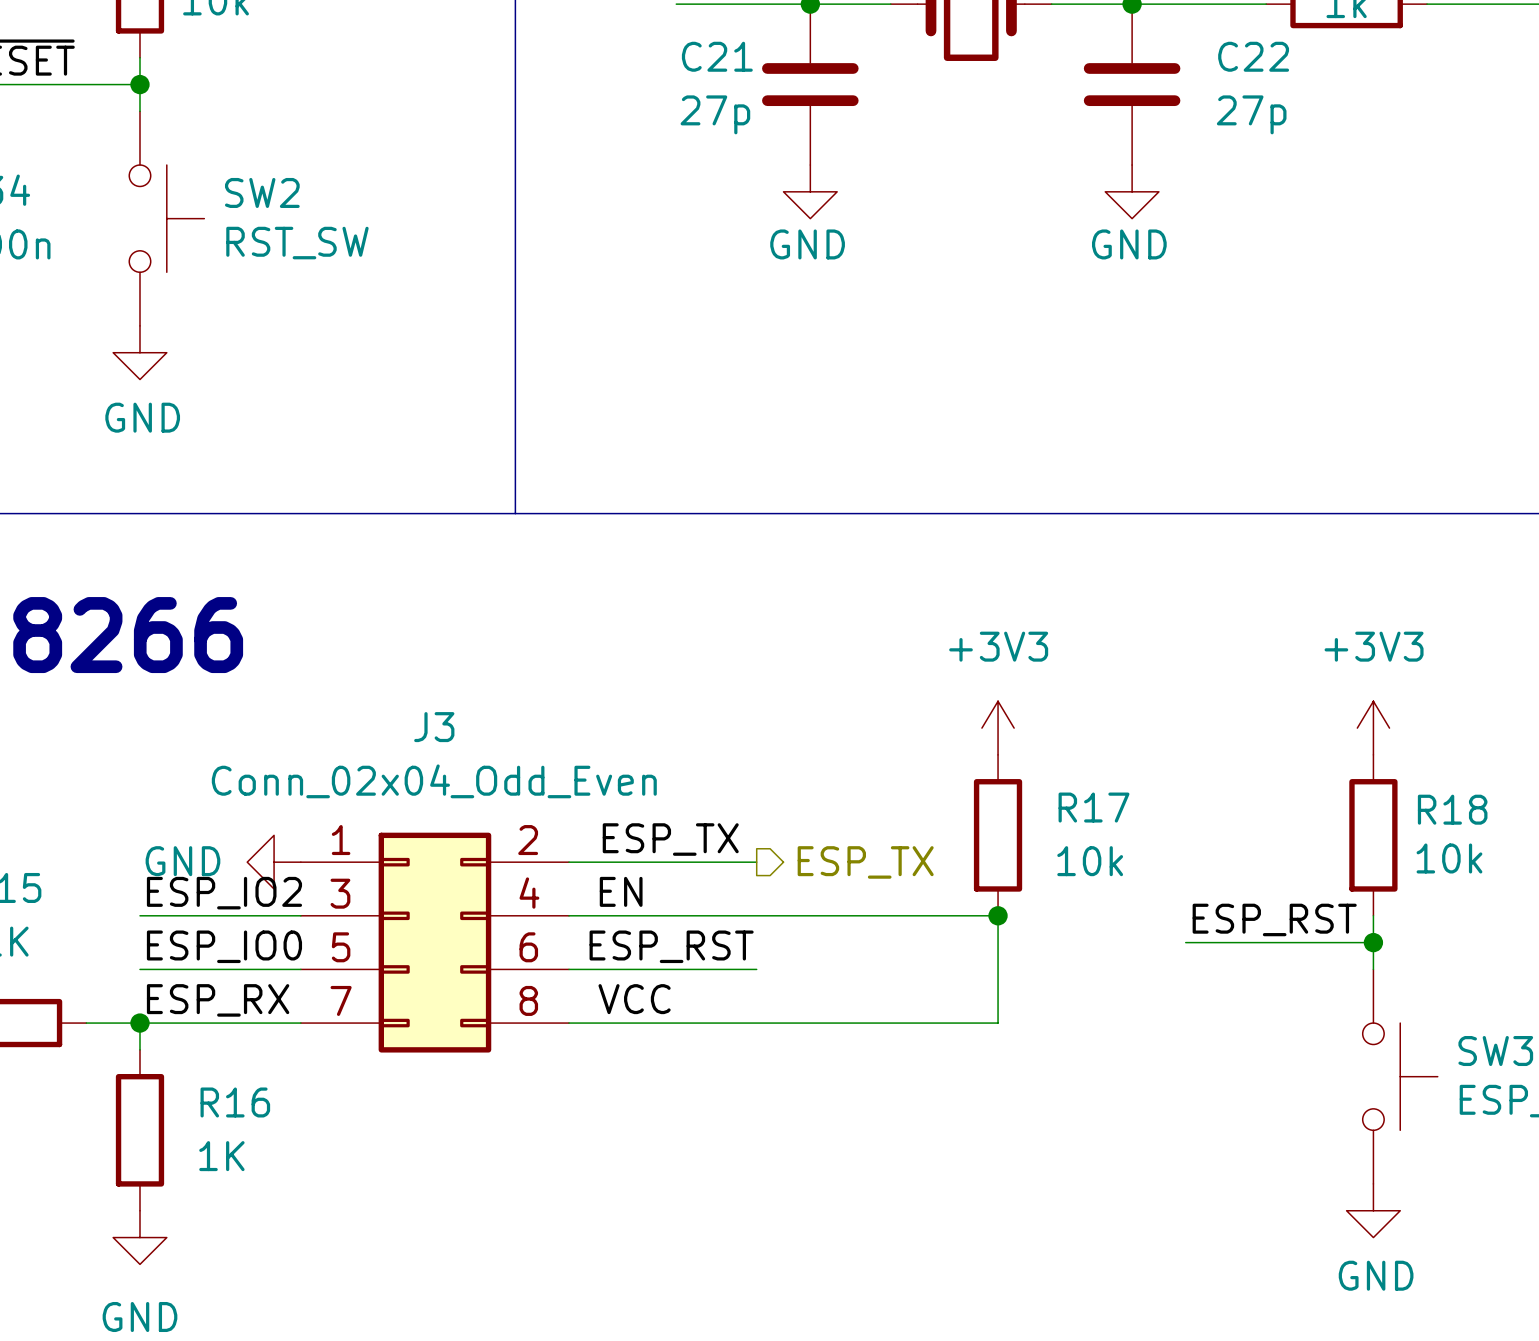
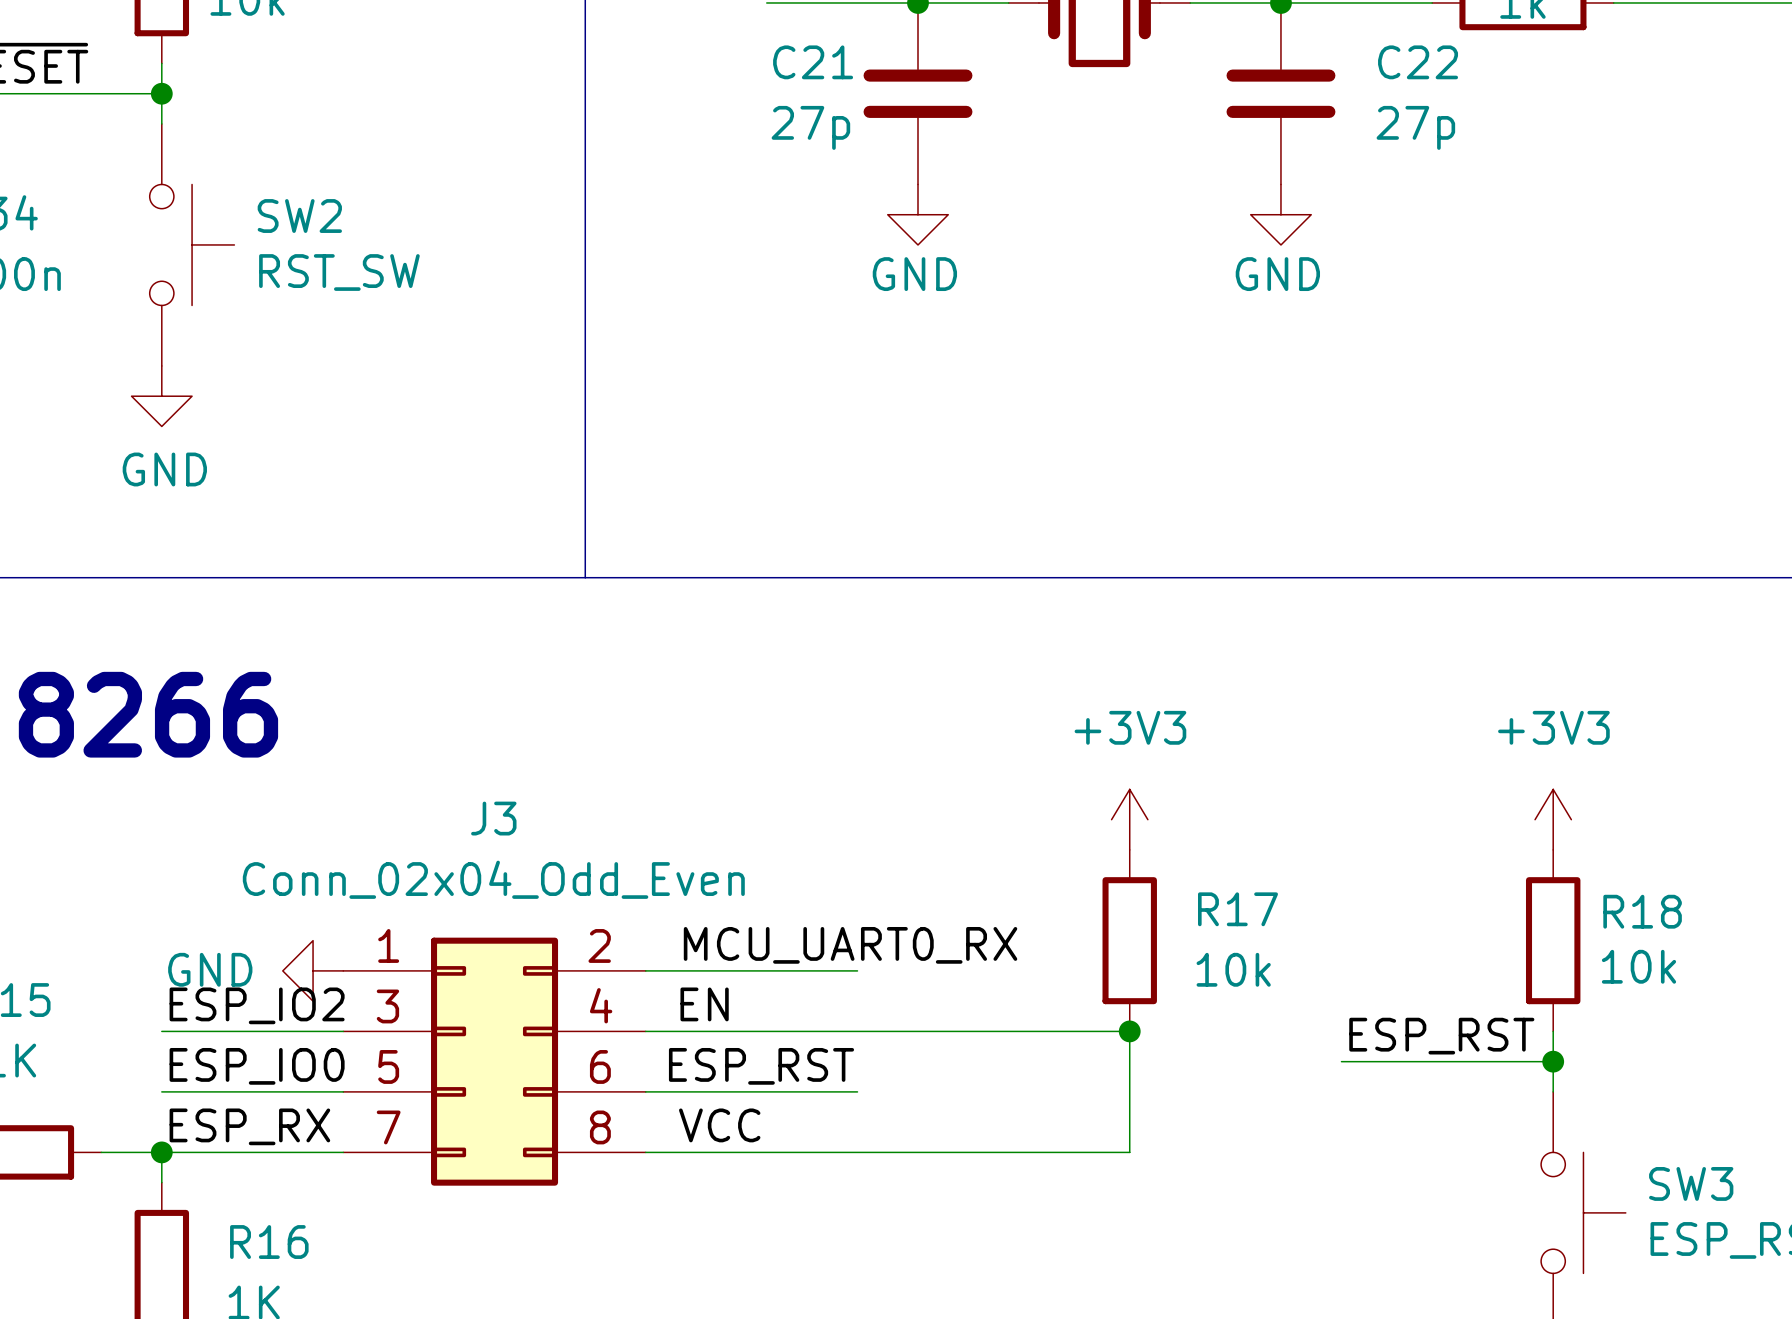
label: ESP_TX (670, 839) -> MCU_UART0_RX (850, 945)
hierarchical label: ESP_TX (865, 862) -> none

